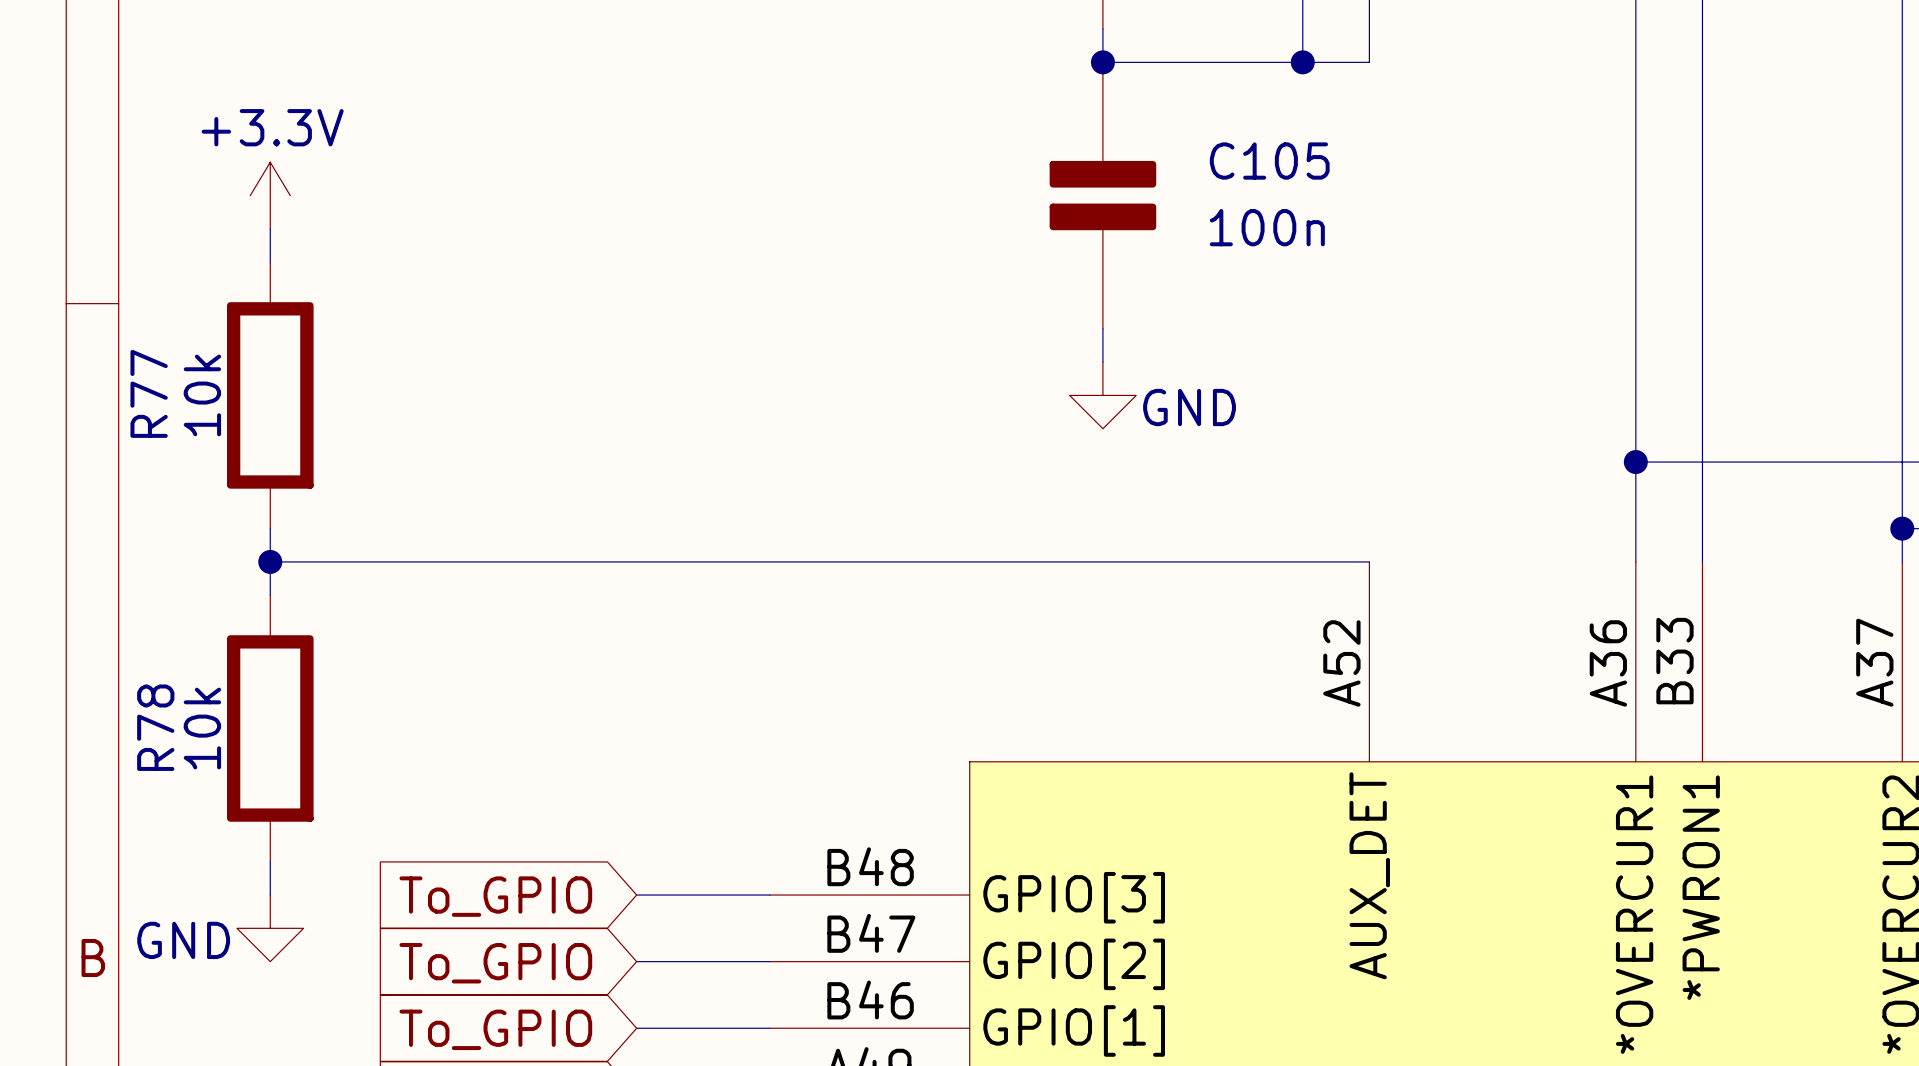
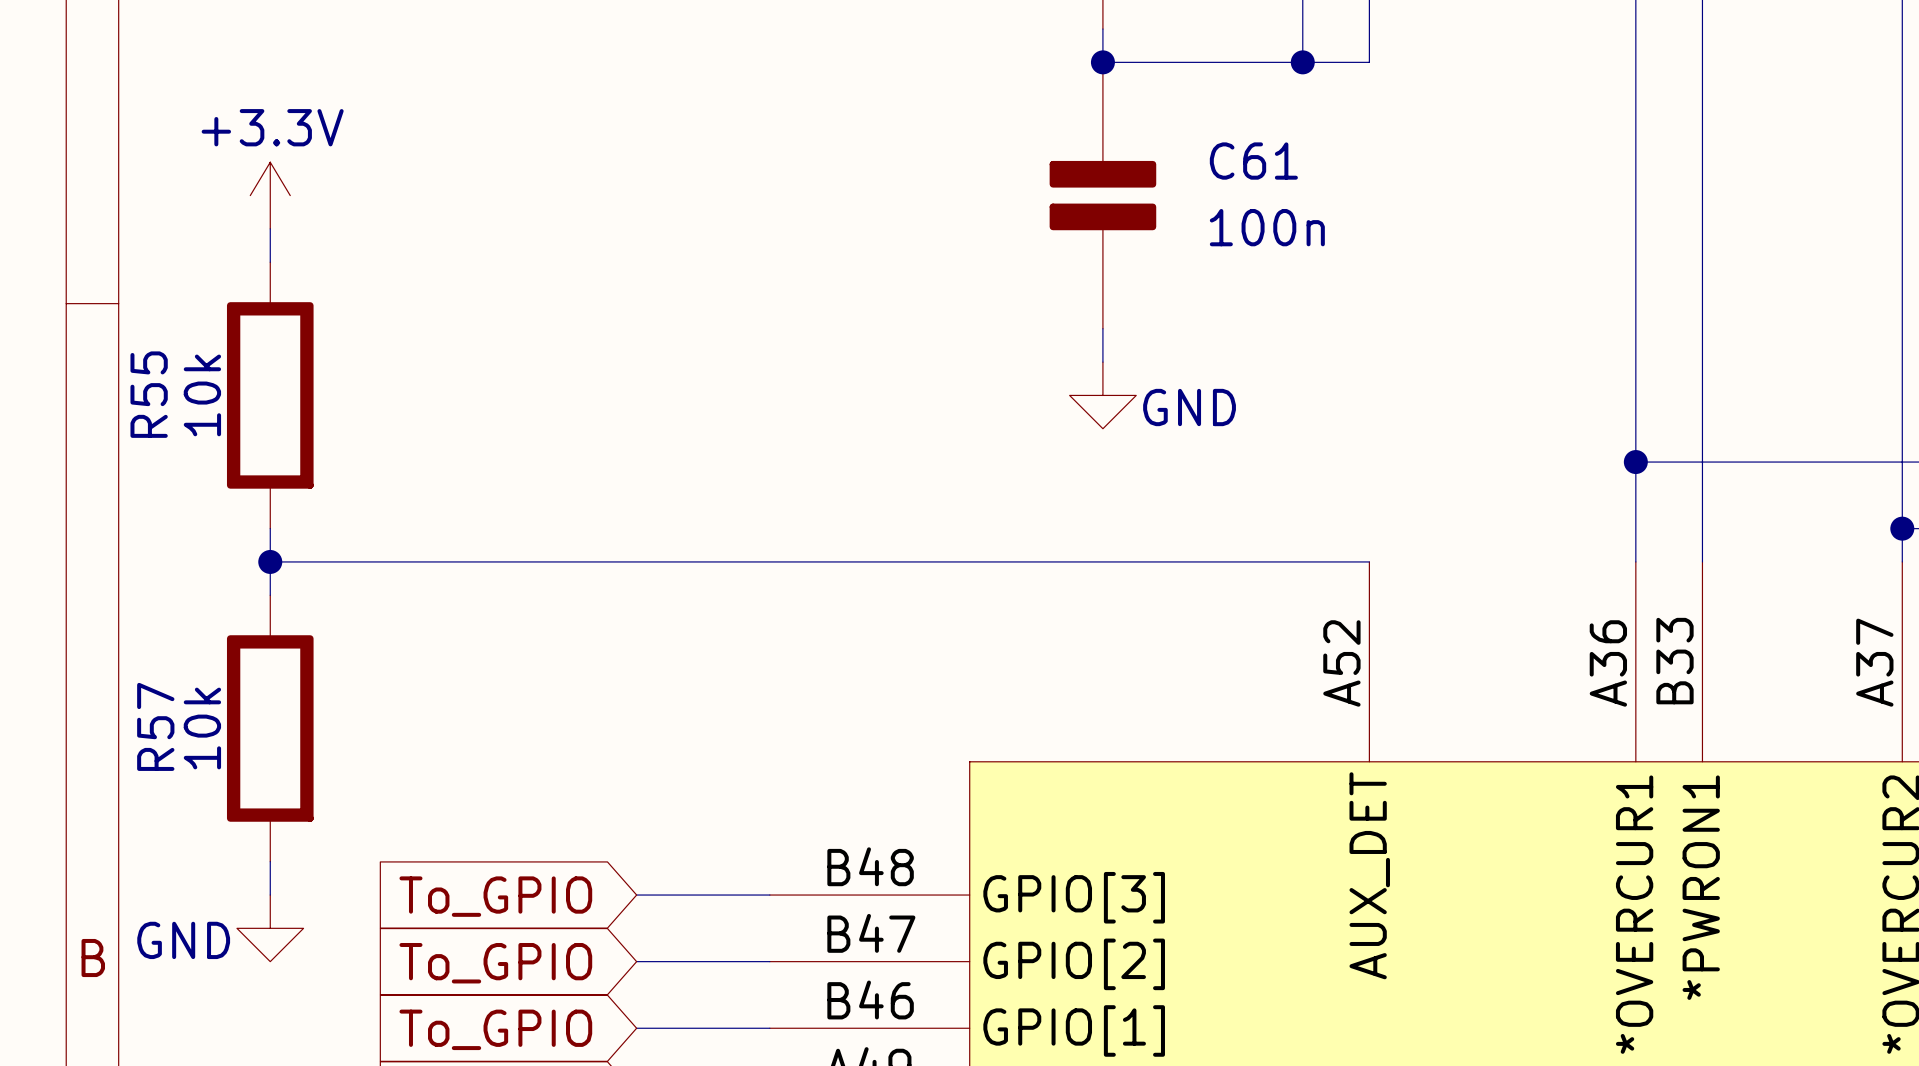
C105 name: C105 (1269, 161) -> C61 (1253, 161)
R77 name: R77 (149, 393) -> R55 (149, 394)
R78 name: R78 (155, 727) -> R57 (155, 726)

